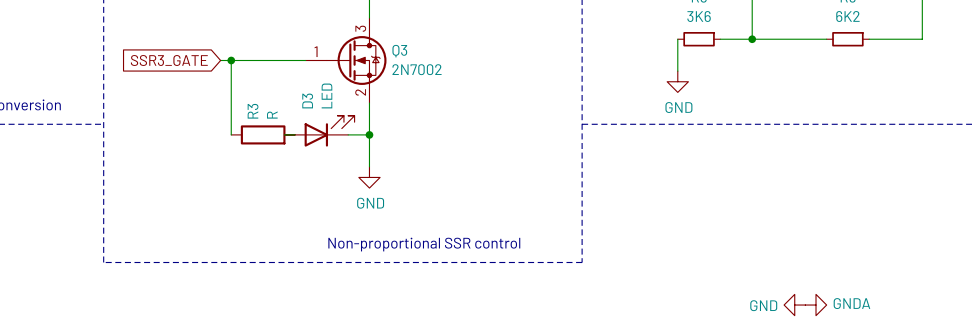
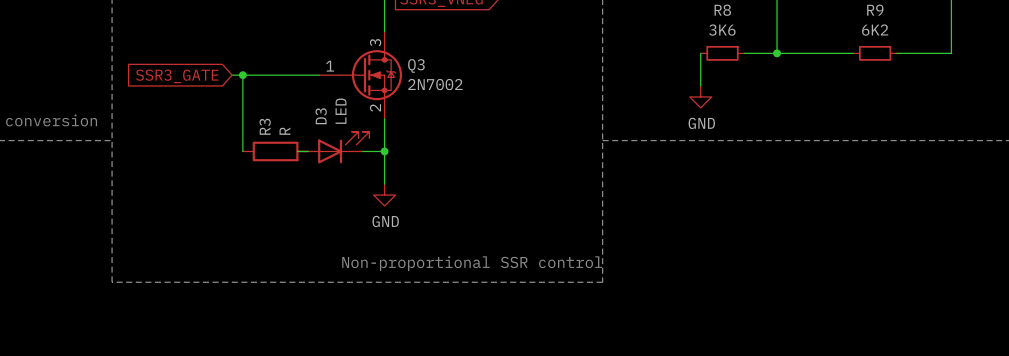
power symbol: GND (794, 305) -> none
power symbol: GNDA (816, 305) -> none

